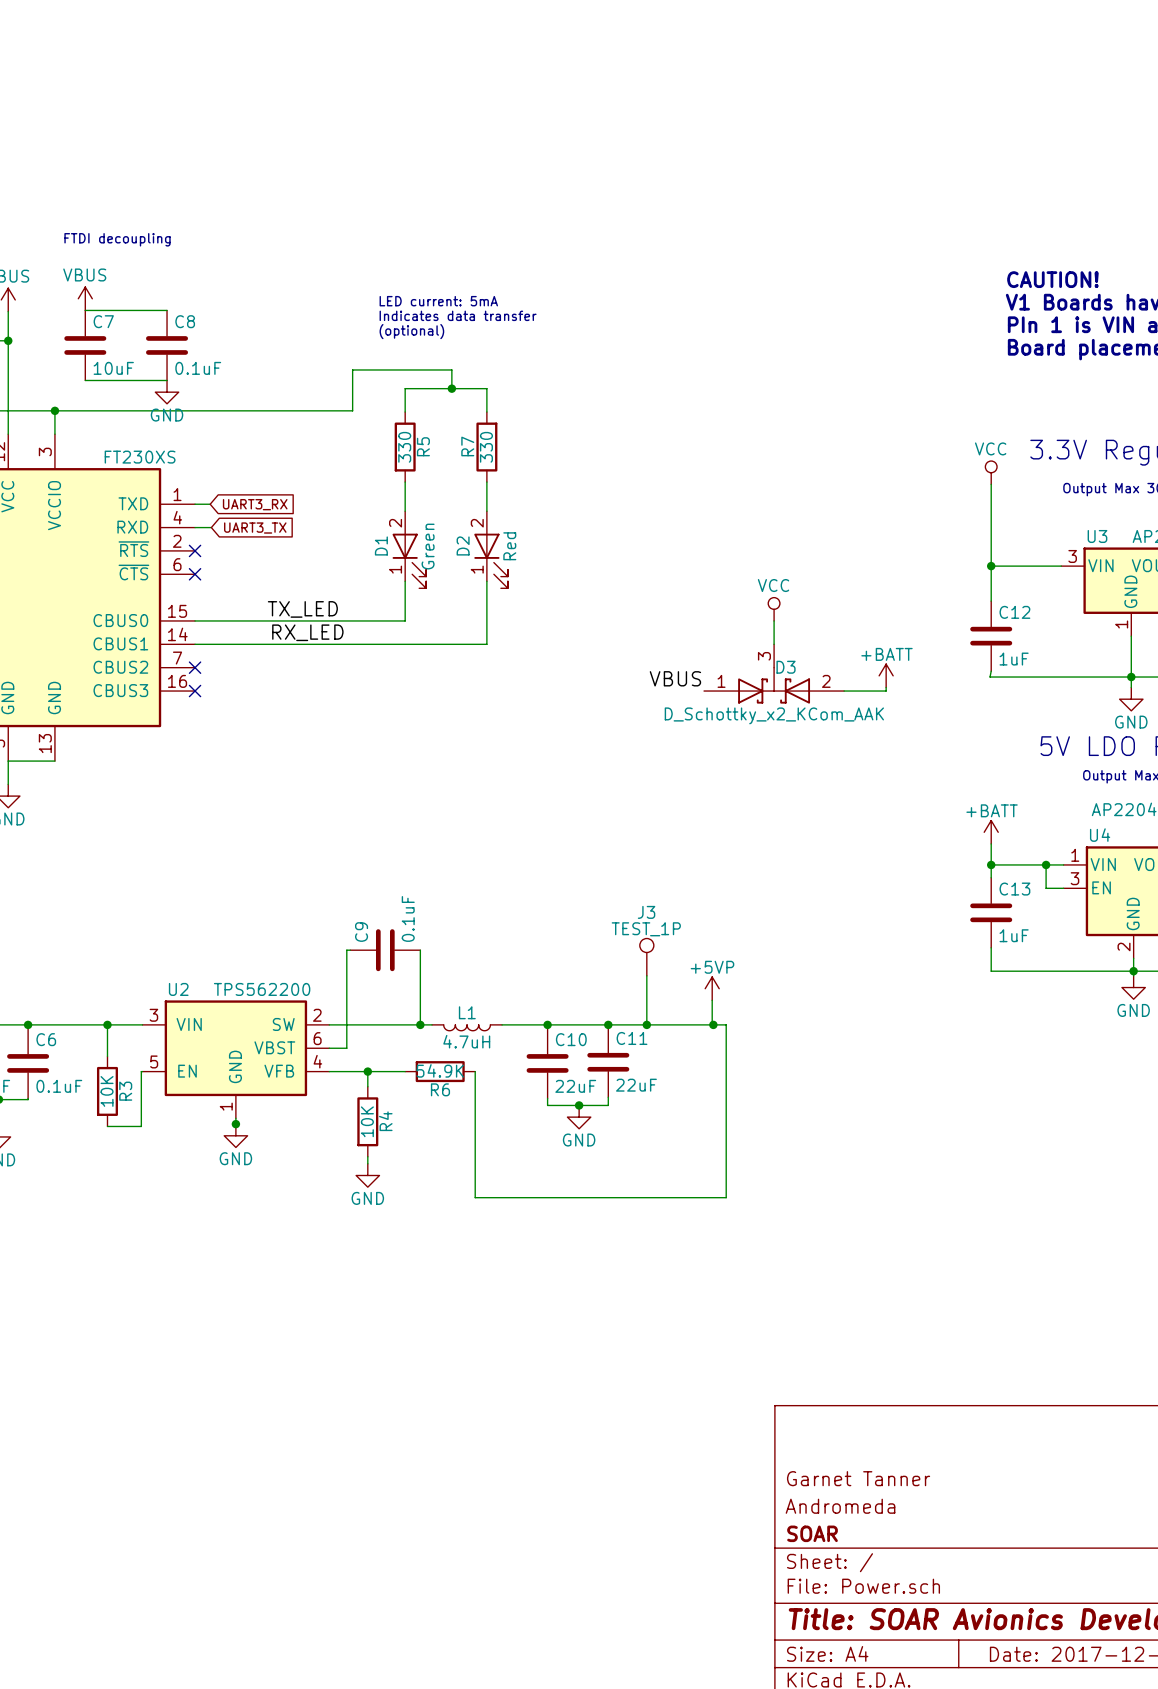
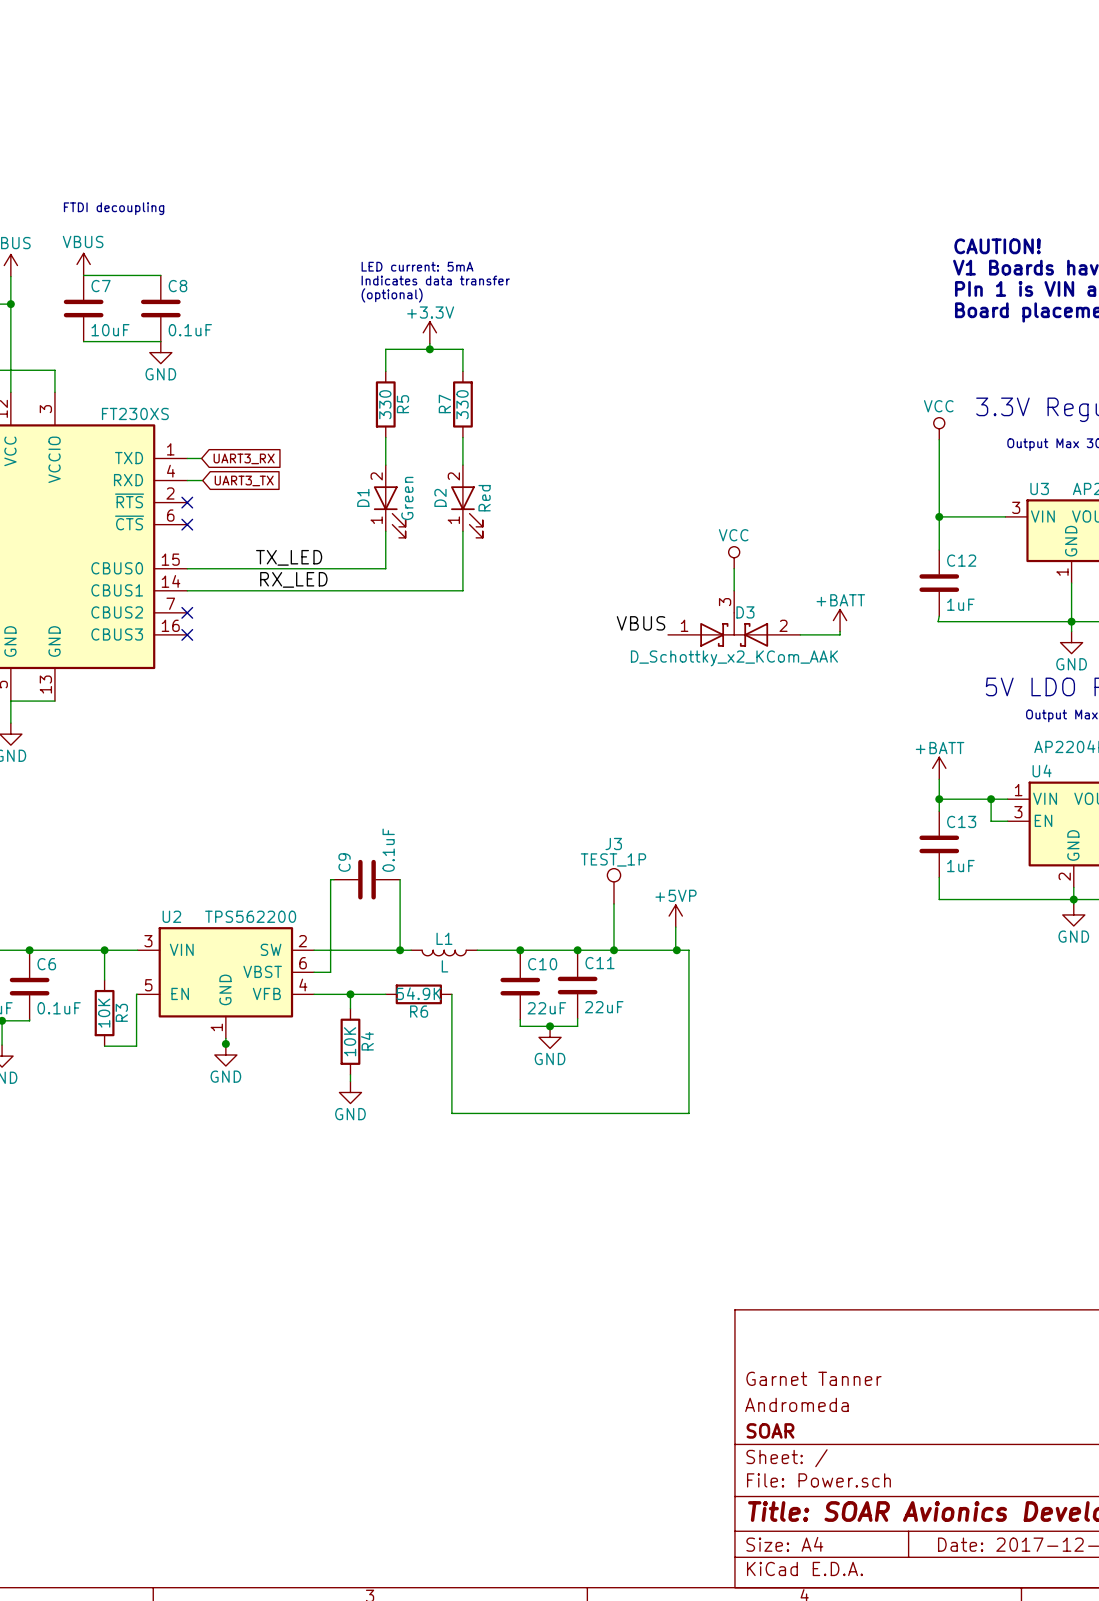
power symbol: none -> +3.3V (429, 332)
wire: (451, 382) (451, 369) (352, 369) (352, 410) (54, 410) -> none
junction: (54, 410) -> none
L1 value: 4.7uH (466, 1041) -> L (444, 966)

